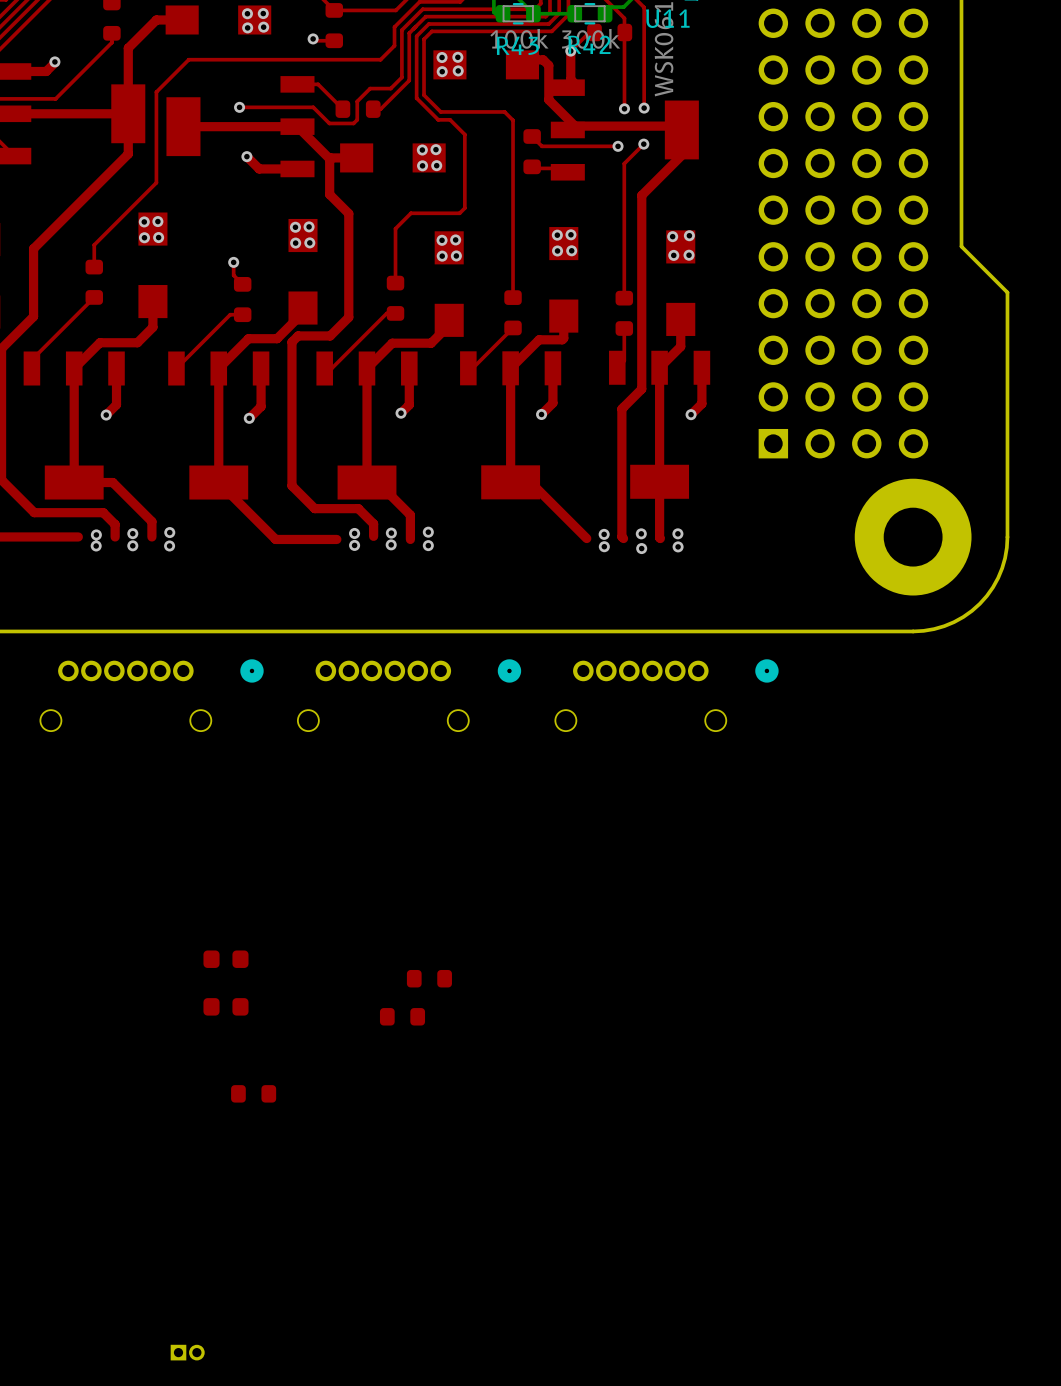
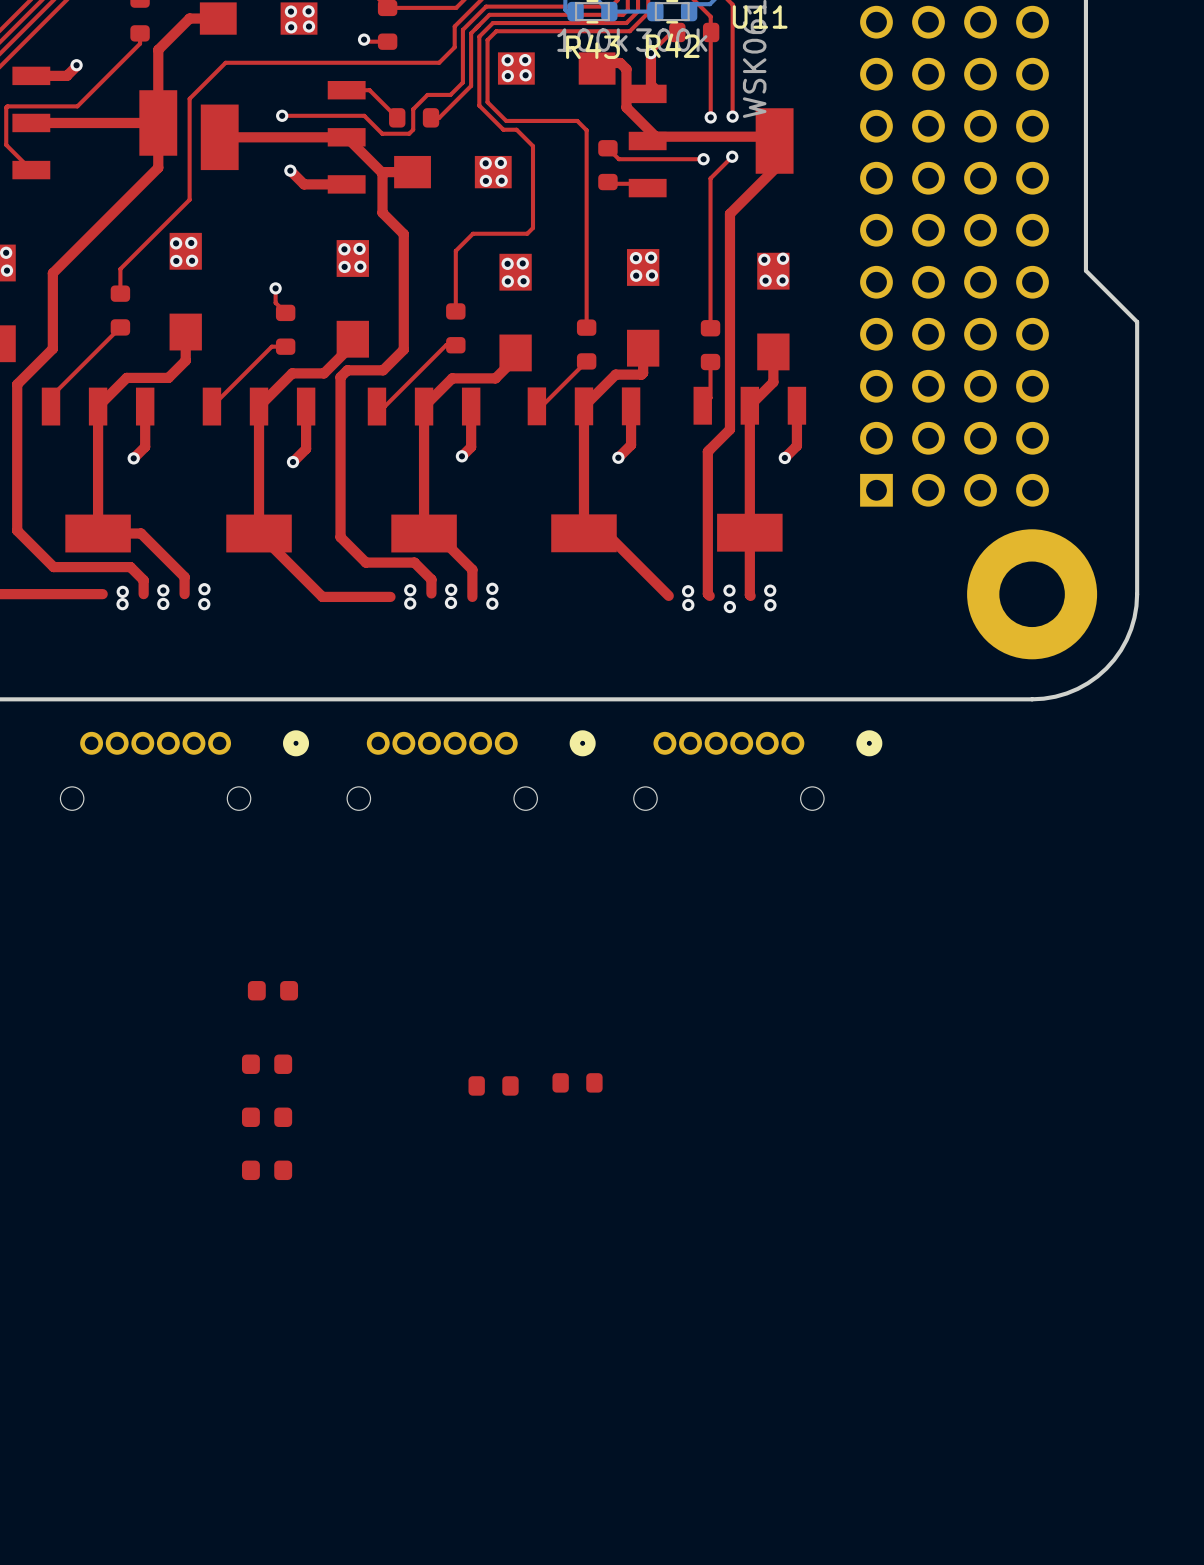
part: none -> (272, 990)
part position: (402, 1016) -> (577, 1082)
part: none -> (267, 1170)
part: (253, 1093) -> none
part: (187, 1352) -> none

